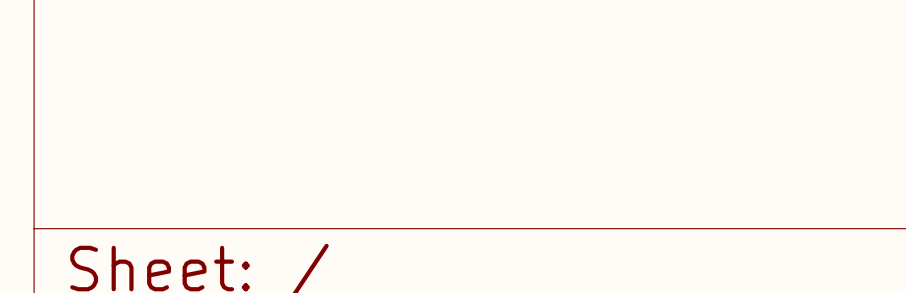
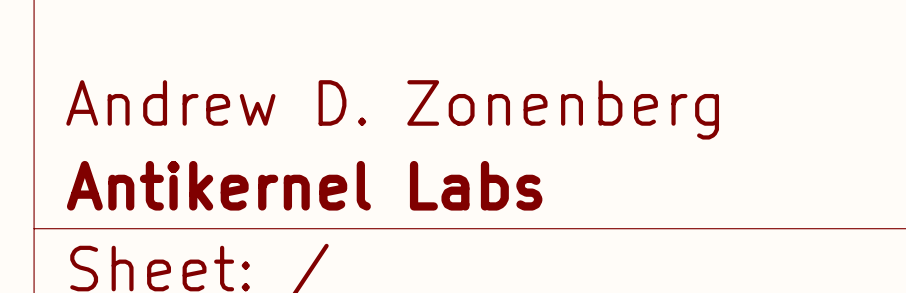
title block: none -> Andrew D. Zonenberg (392, 109)
title block: none -> Antikernel Labs (304, 185)

